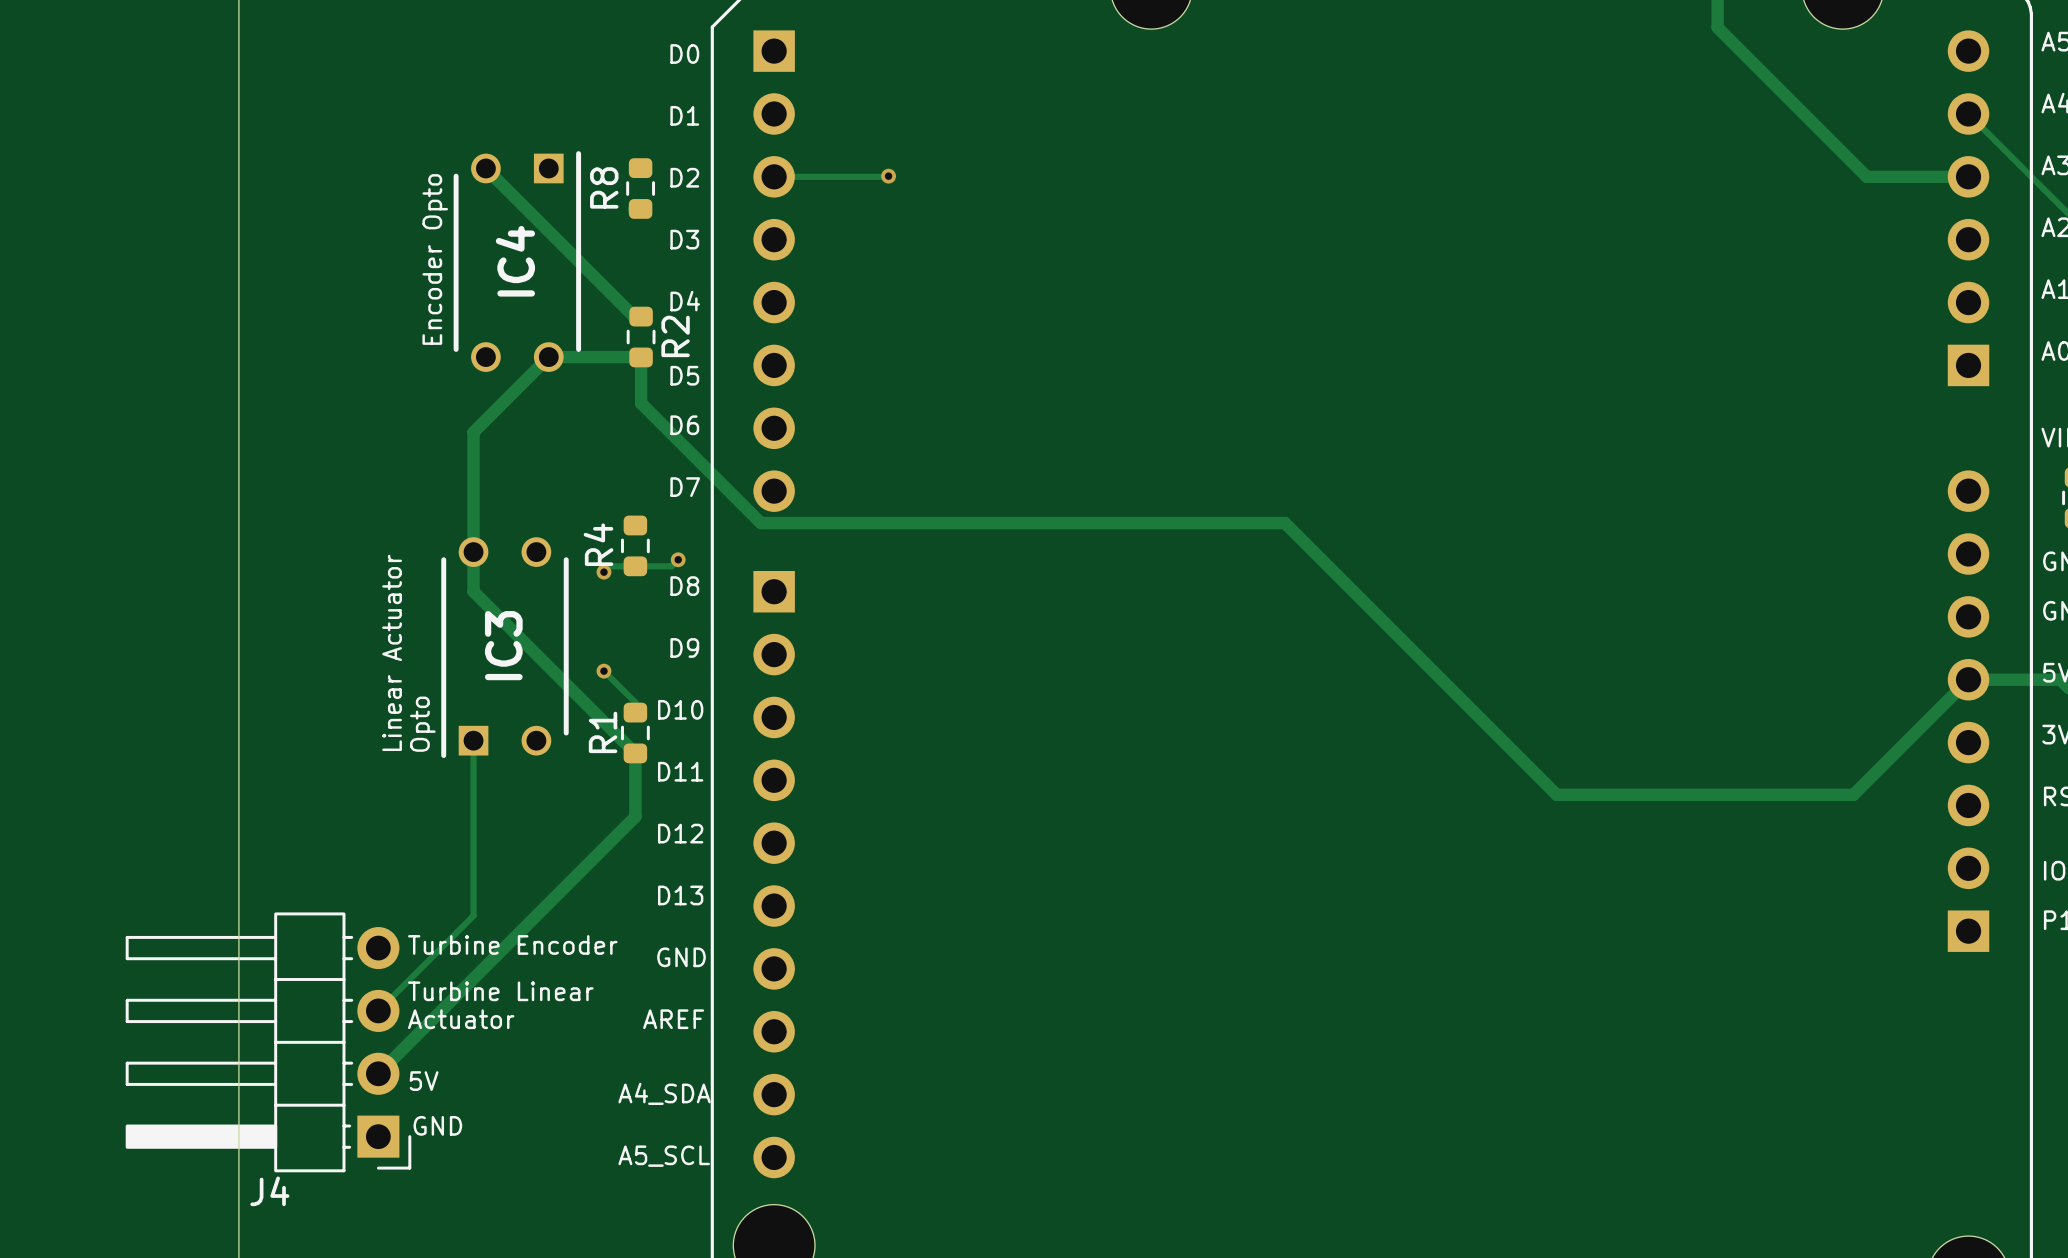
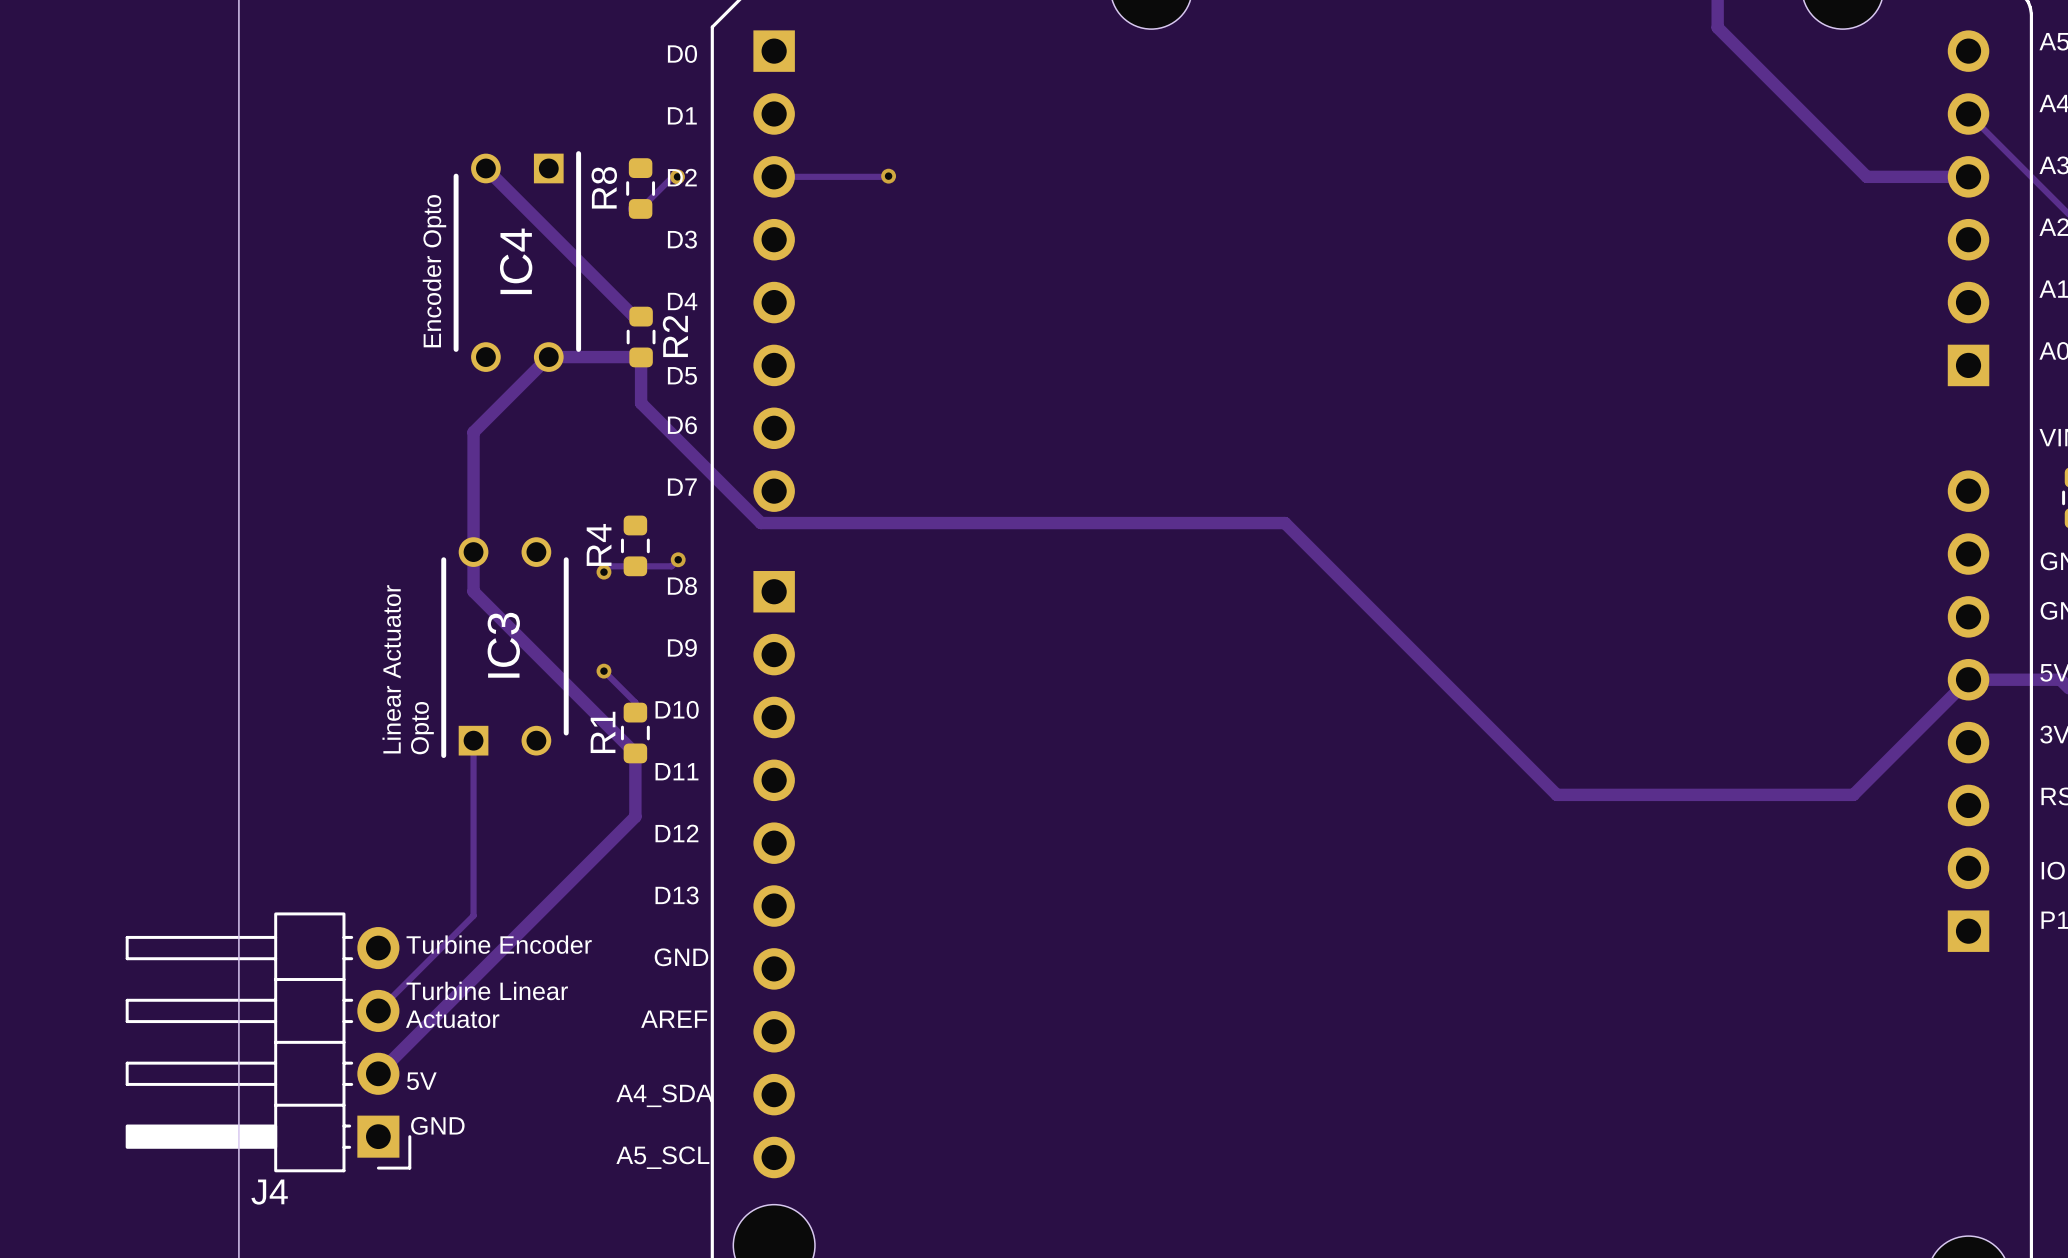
track: none -> (677, 176) (672, 176) (640, 208)
via: none -> (677, 176)

